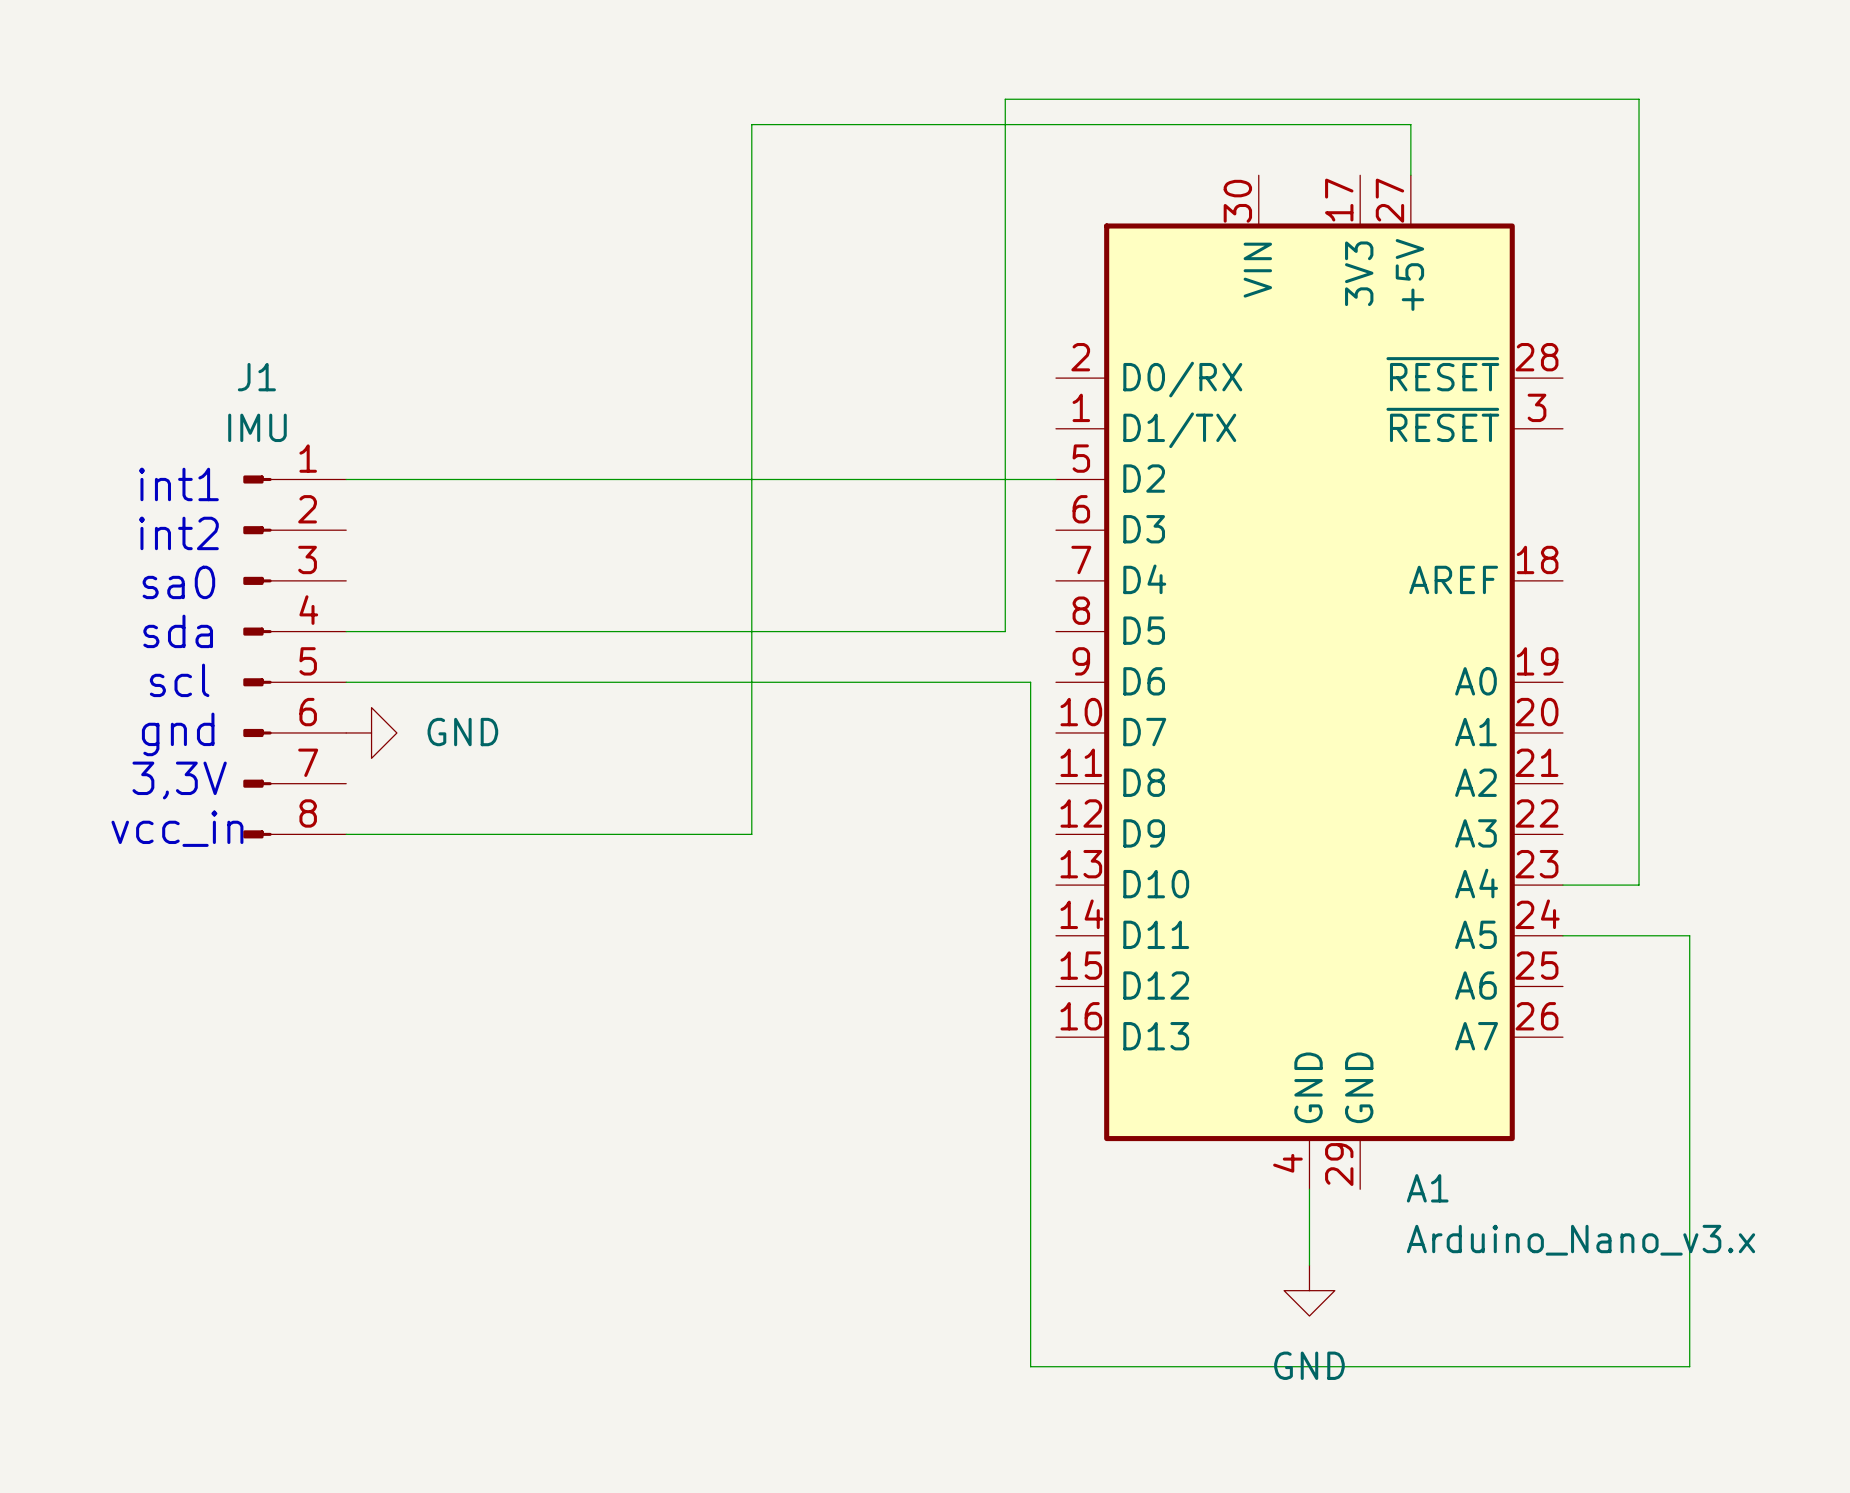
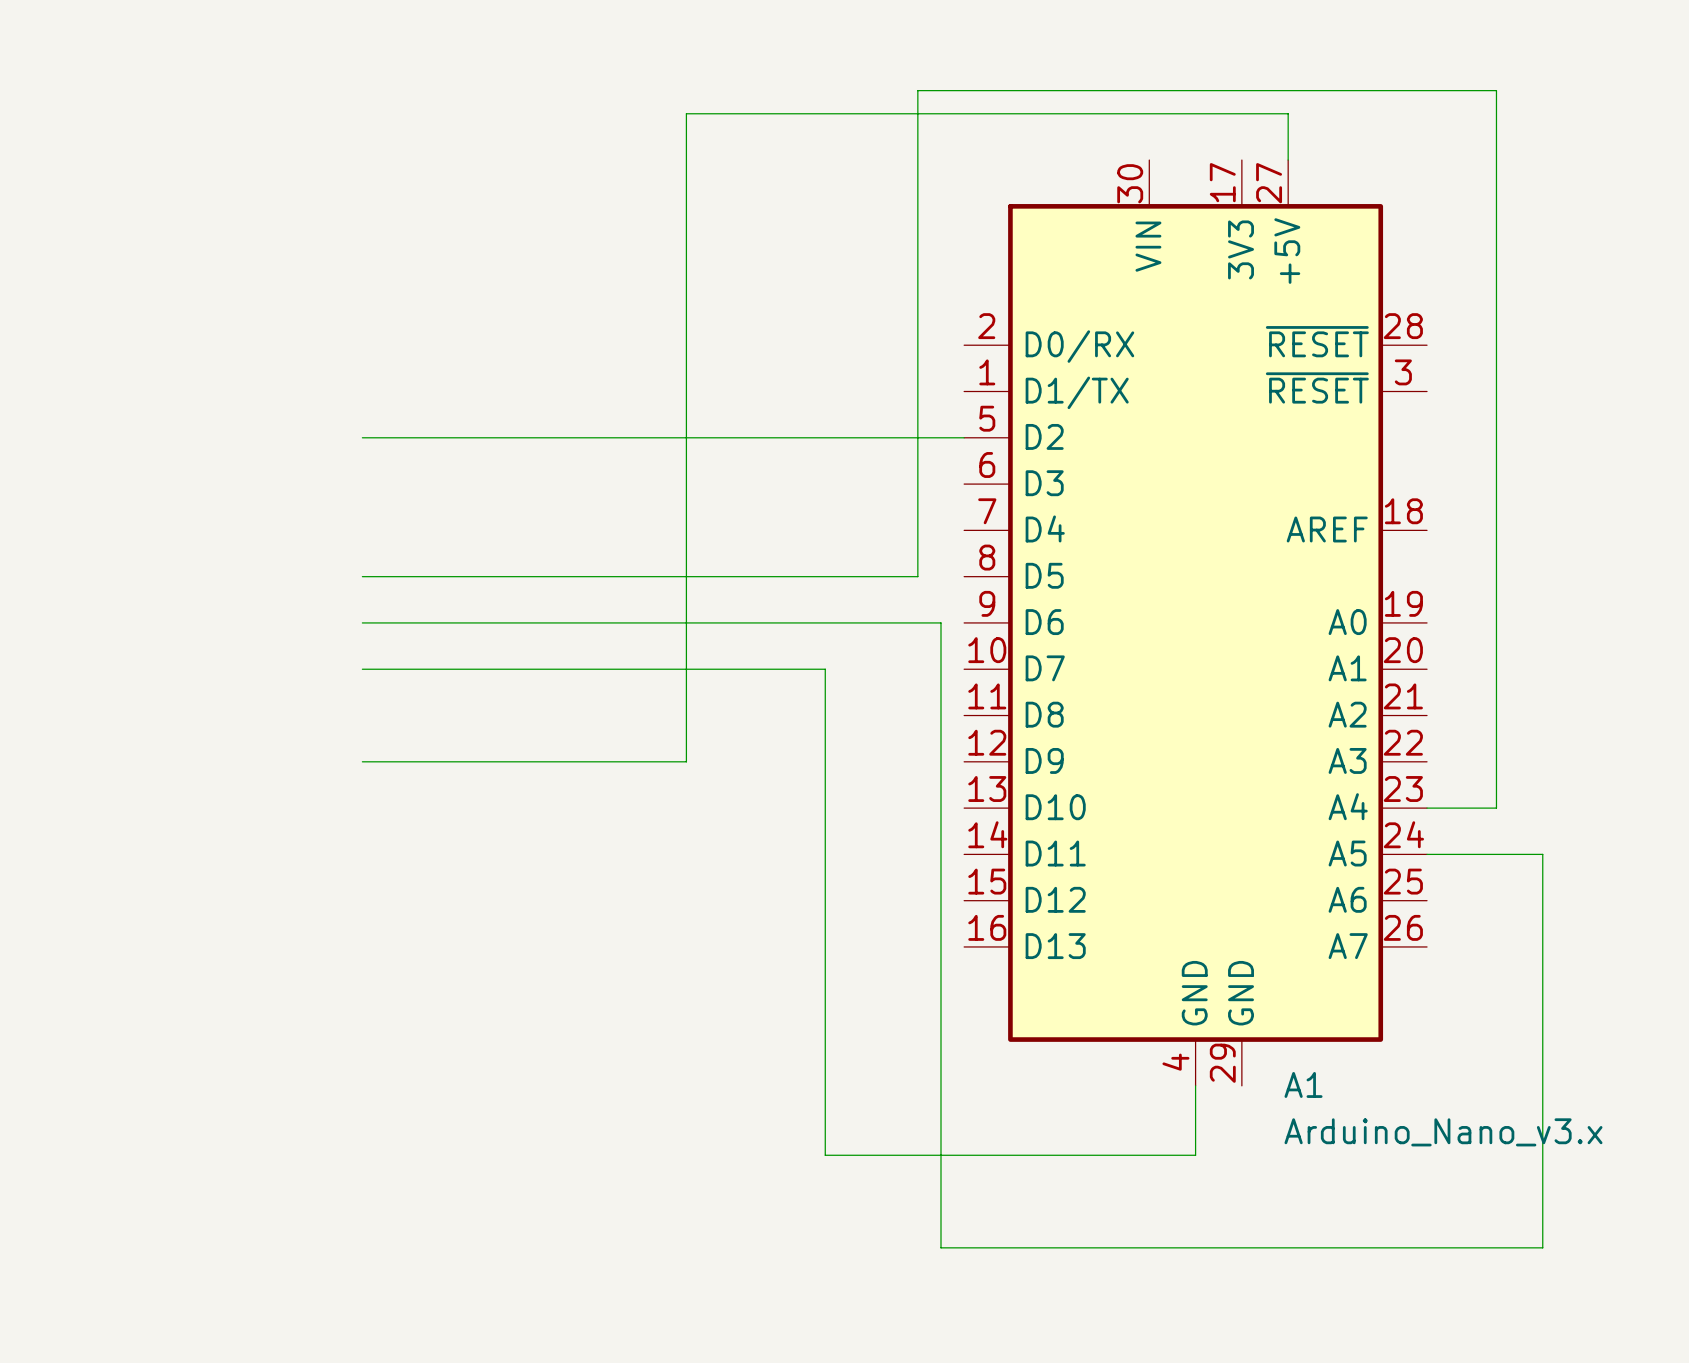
wire: (346, 479) (396, 479) -> none
text: int1 (178, 484) -> none
text: int2 (178, 533) -> none
text: sa0 (178, 582) -> none
text: sda (178, 631) -> none
wire: (346, 631) (396, 631) -> none
J1: IMU (294, 656) -> none
text: scl (179, 680) -> none
wire: (346, 682) (396, 682) -> none
power symbol: GND (371, 732) -> none
wire: none -> (362, 669) (825, 669) (825, 1155) (1195, 1155)
text: gnd (178, 734) -> none
text: 3,3V (179, 780) -> none
text: vcc_in (177, 828) -> none
wire: (346, 834) (396, 834) -> none
power symbol: GND (1309, 1290) -> none

